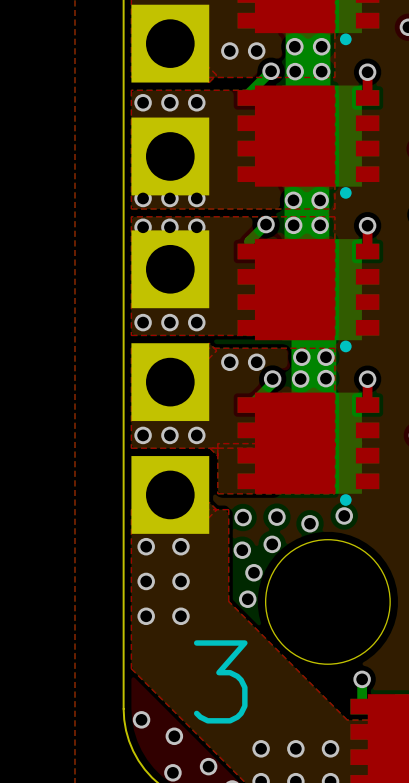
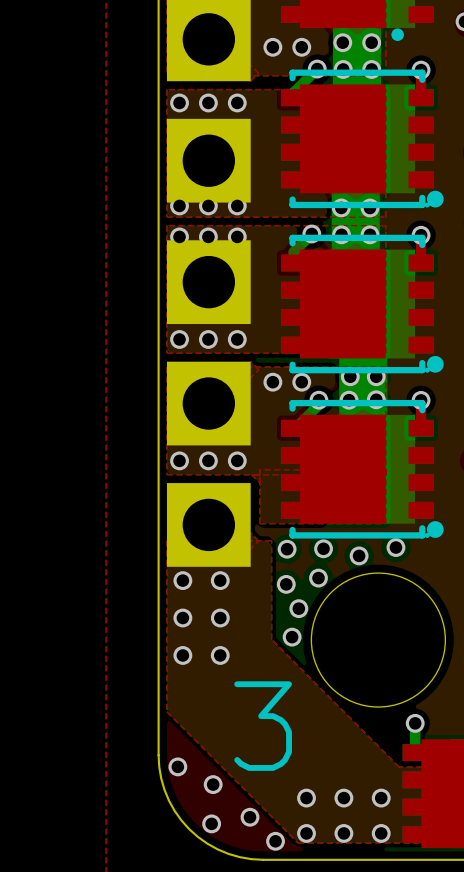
part footprint: [237, 85, 380, 199] -> [281, 69, 444, 209]
part footprint: [237, 239, 380, 353] -> [281, 234, 444, 374]
part footprint: [237, 392, 380, 506] -> [281, 399, 444, 539]

